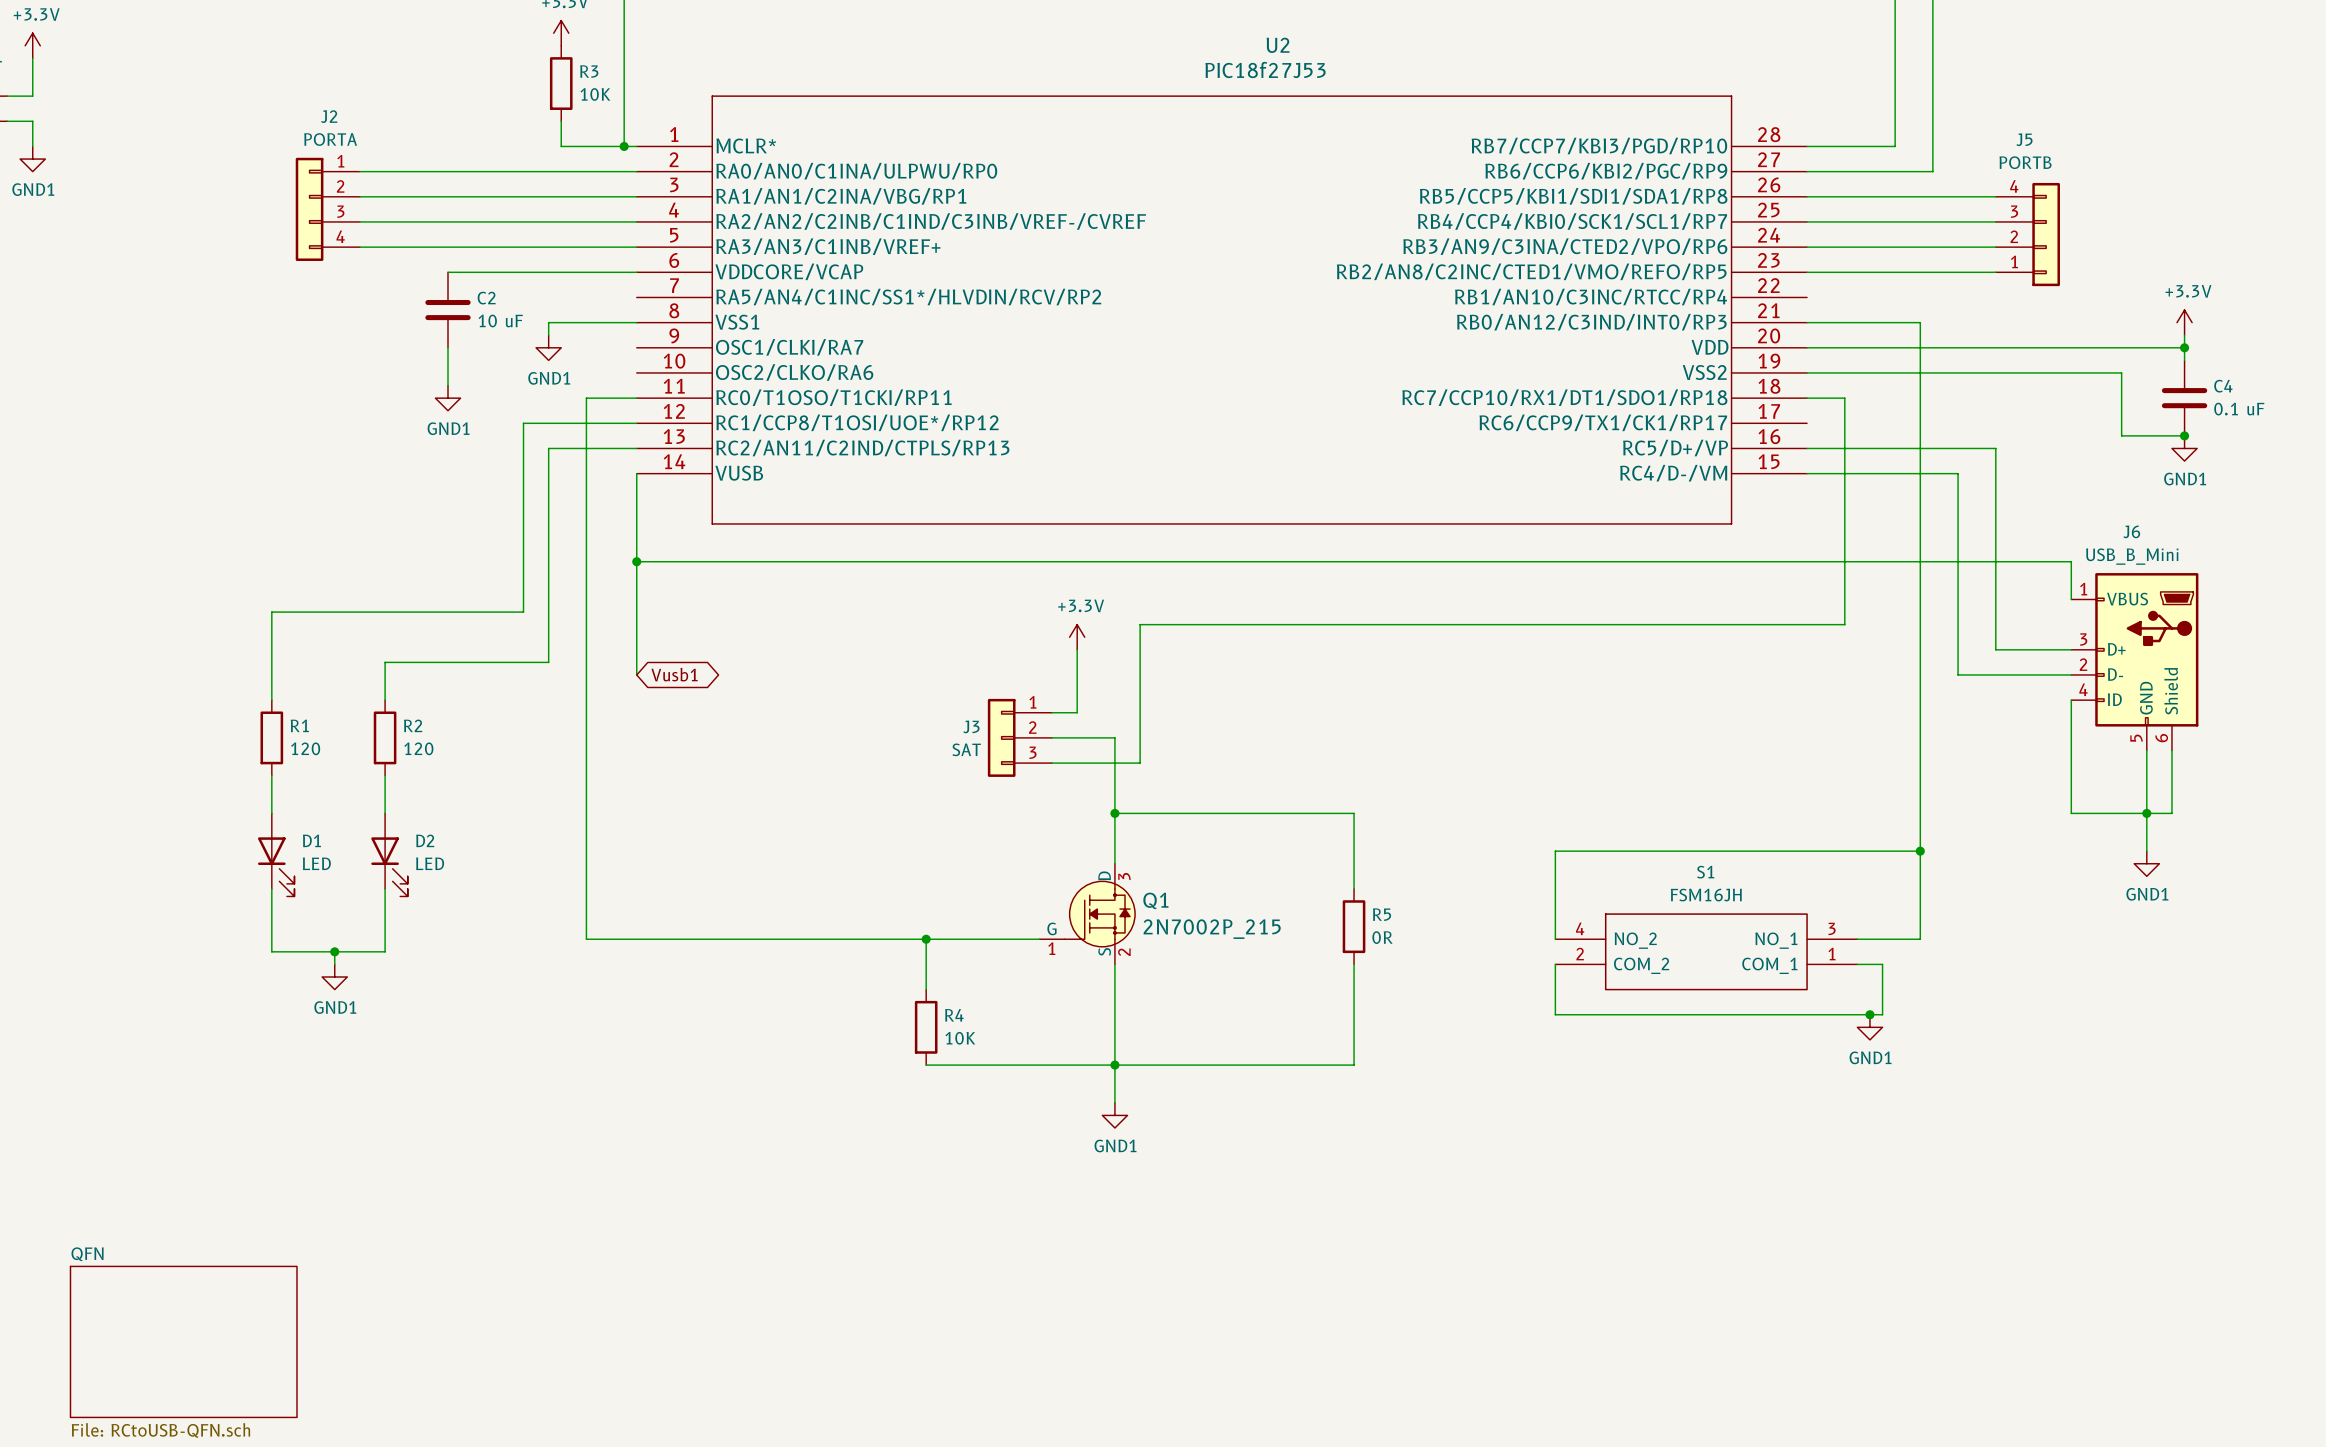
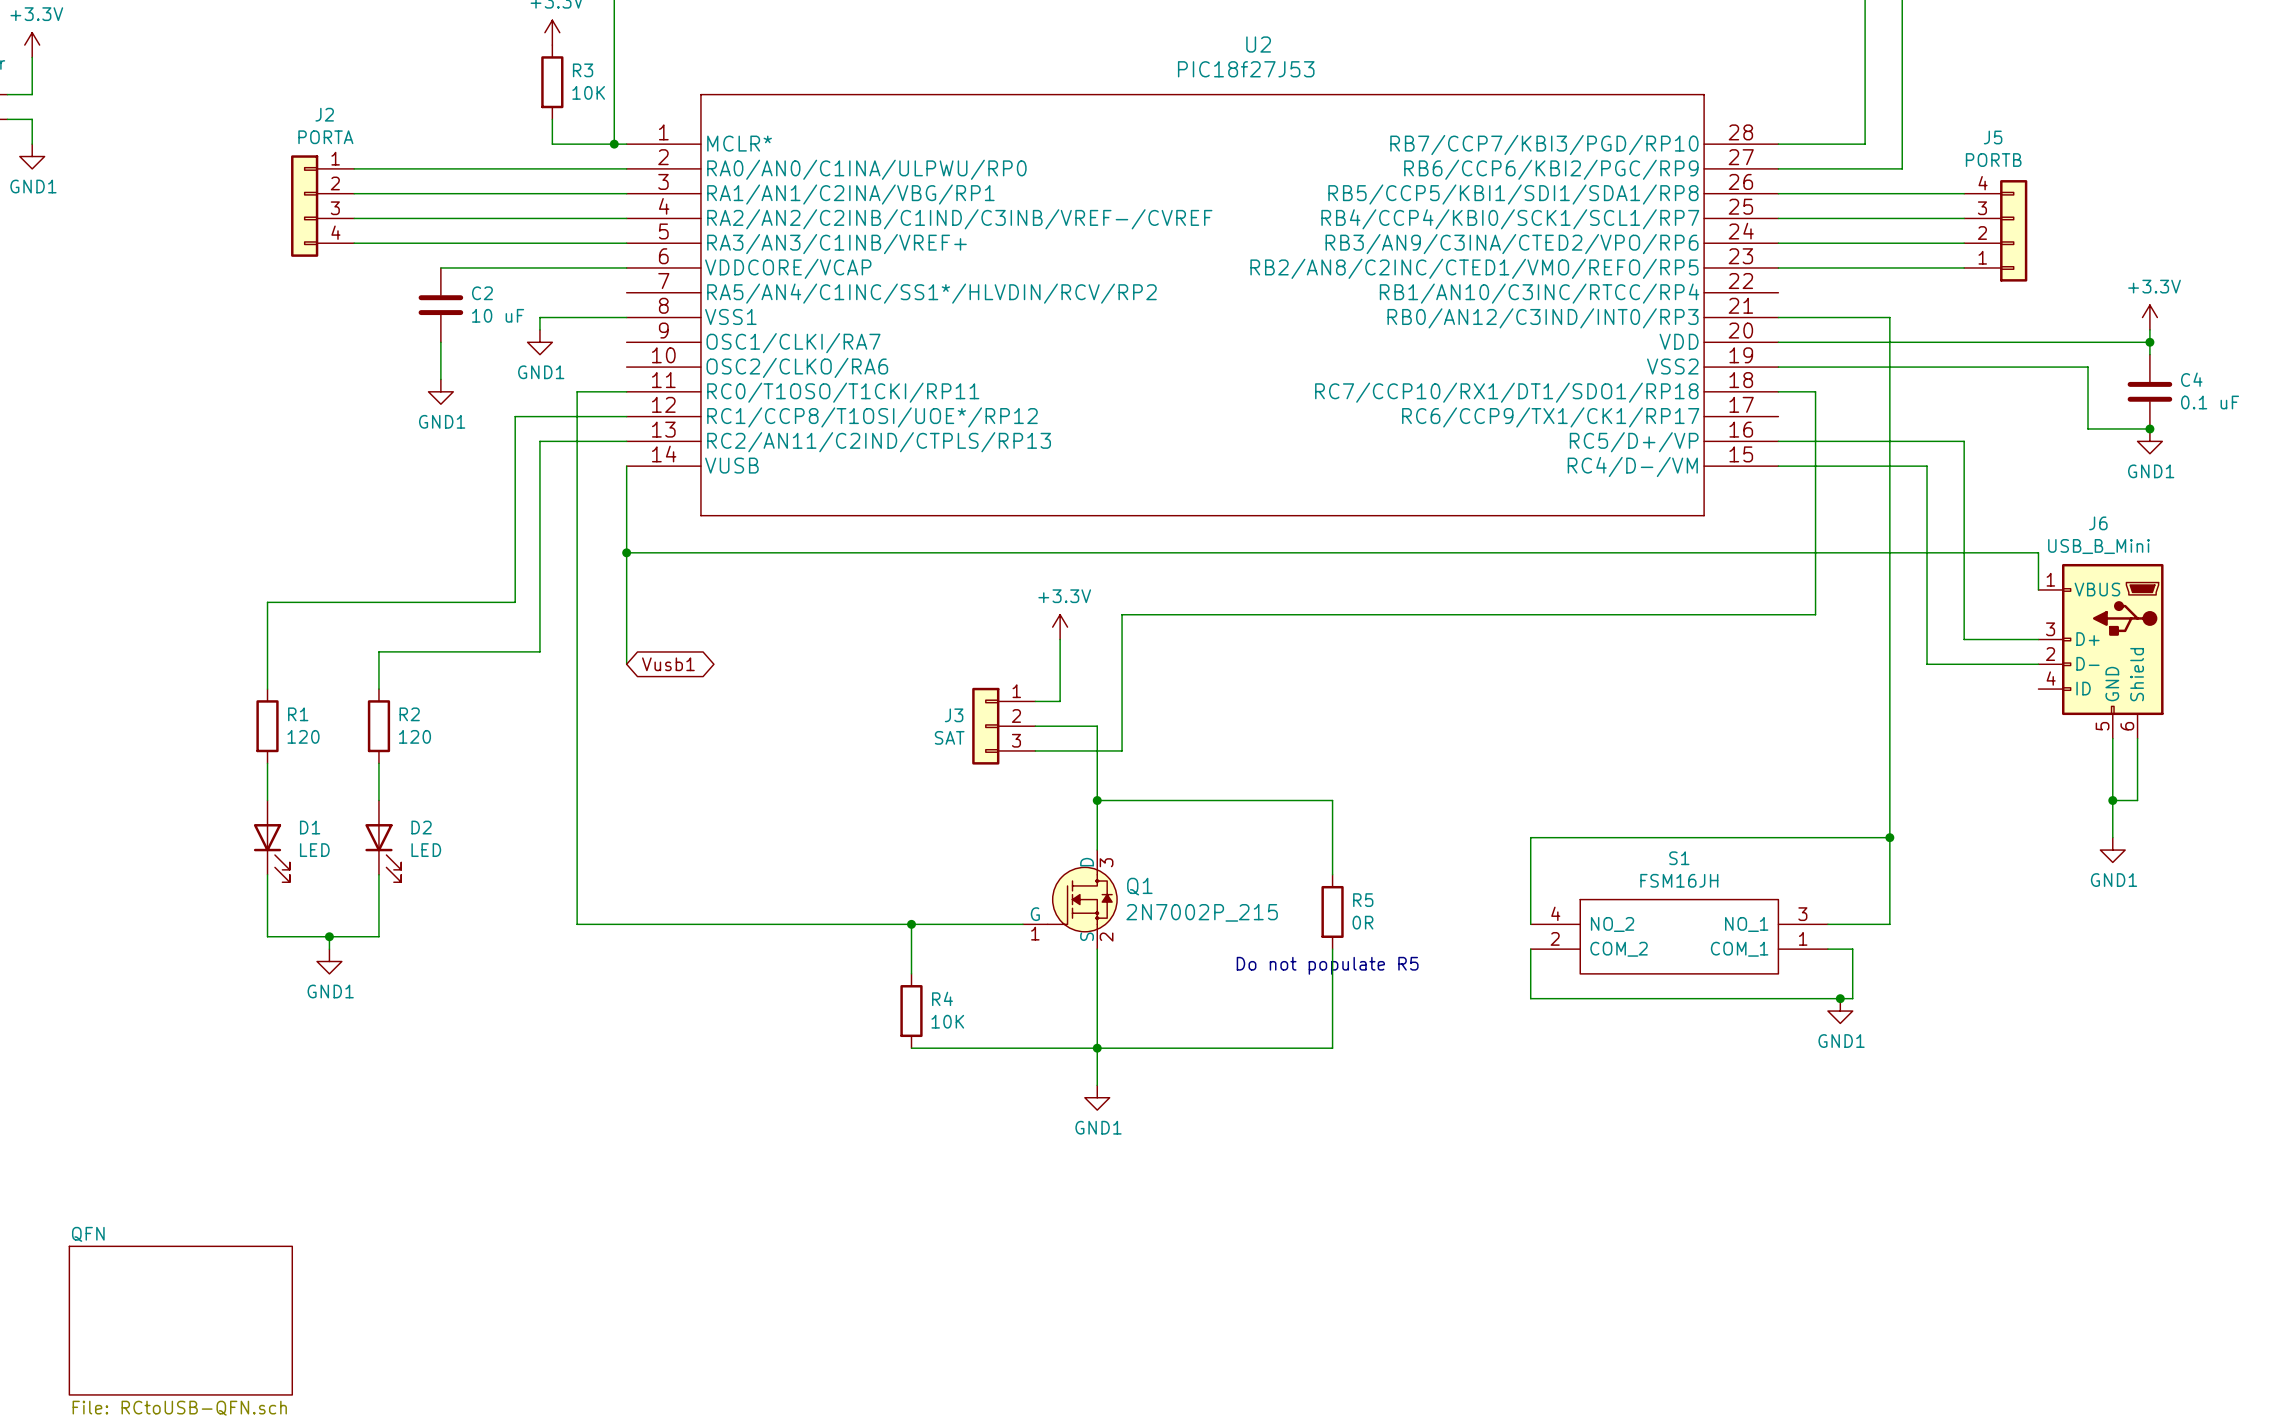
wire: (2071, 700) (2071, 813) (2146, 813) -> none
text: none -> Do not populate R5 (1327, 965)

